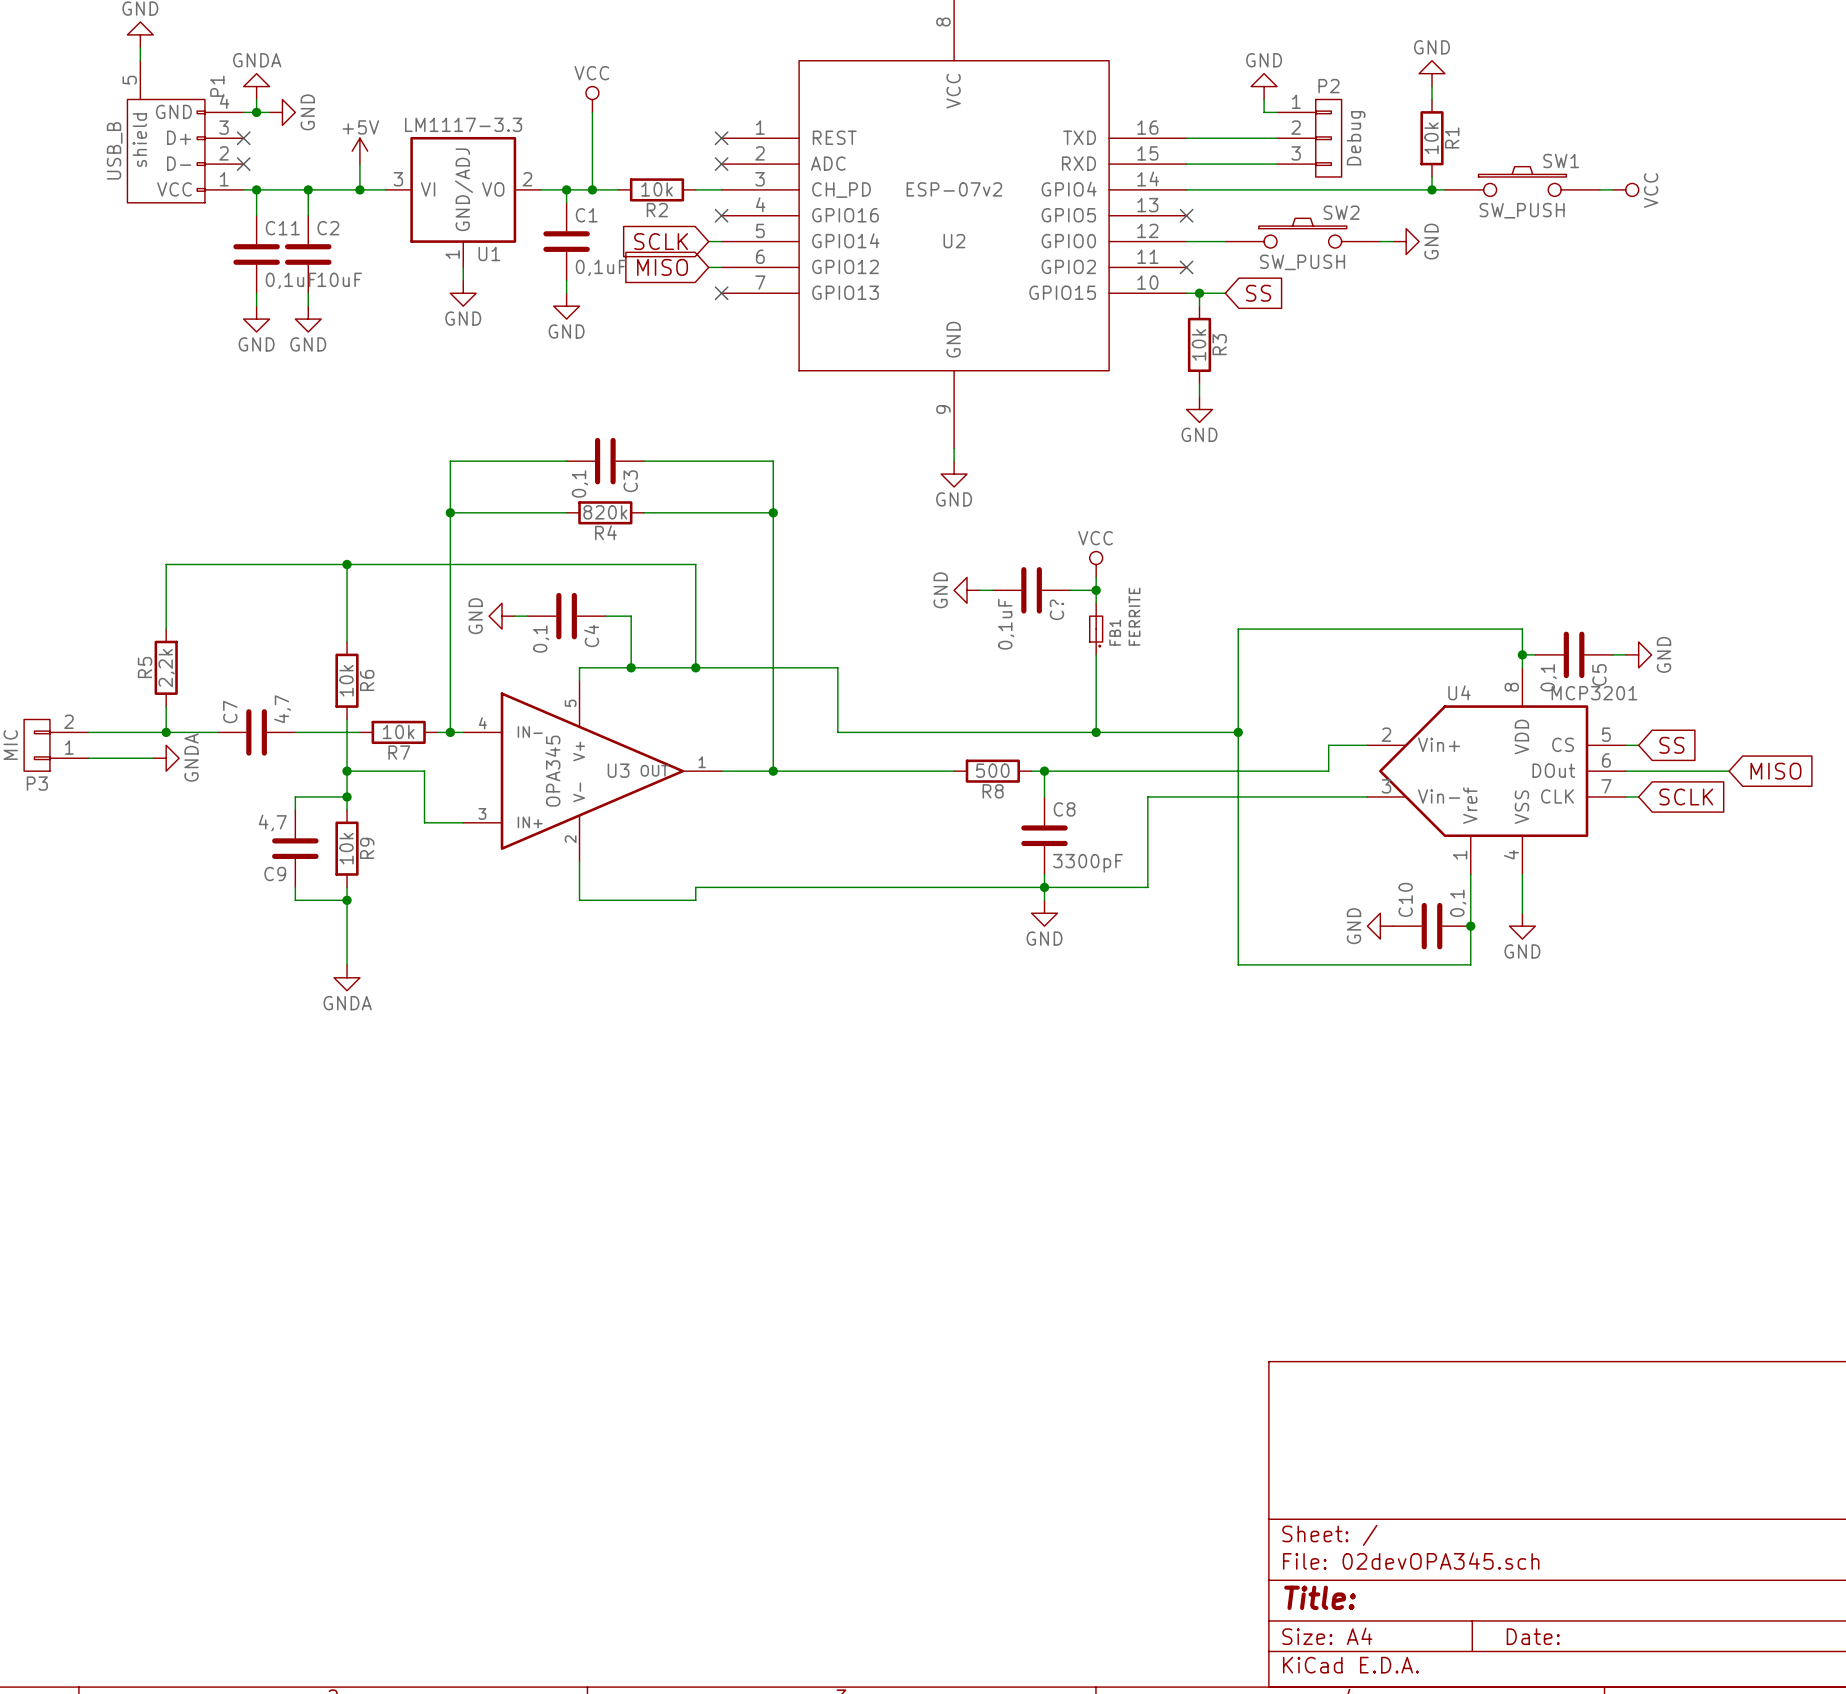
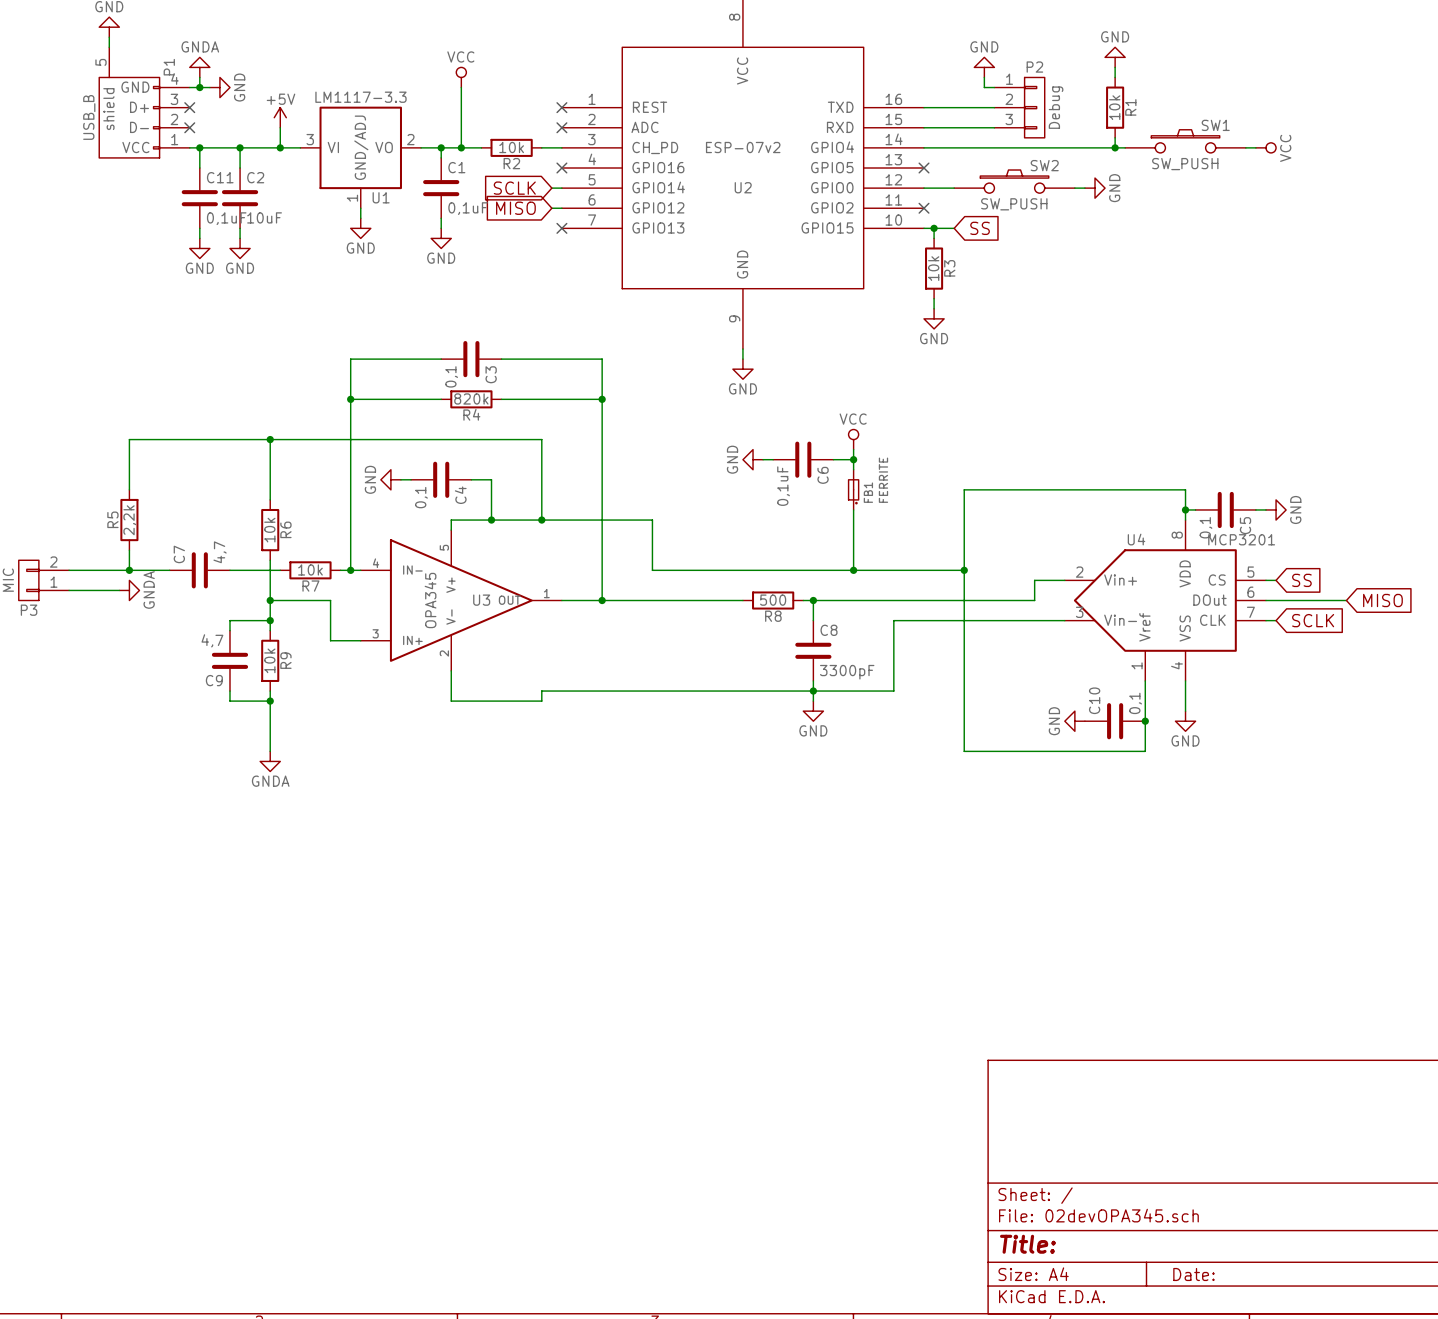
C? name: C? (1056, 609) -> C6 (823, 475)

